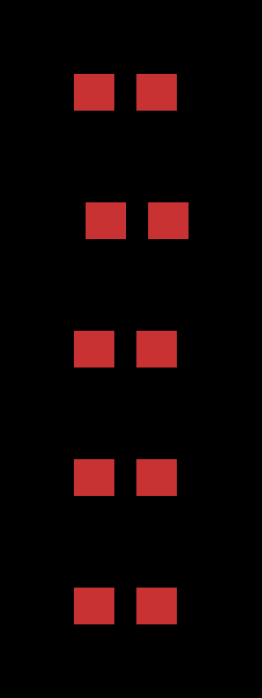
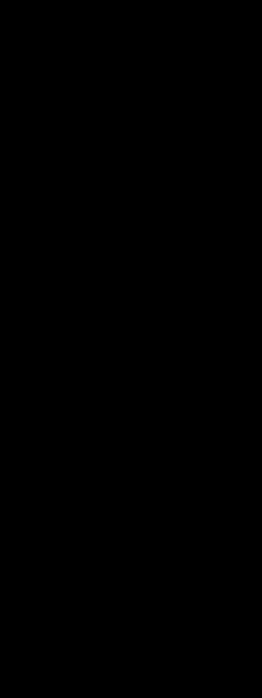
part: (125, 92) -> none
part: (137, 220) -> none
part: (125, 349) -> none
part: (125, 477) -> none
part: (125, 605) -> none

